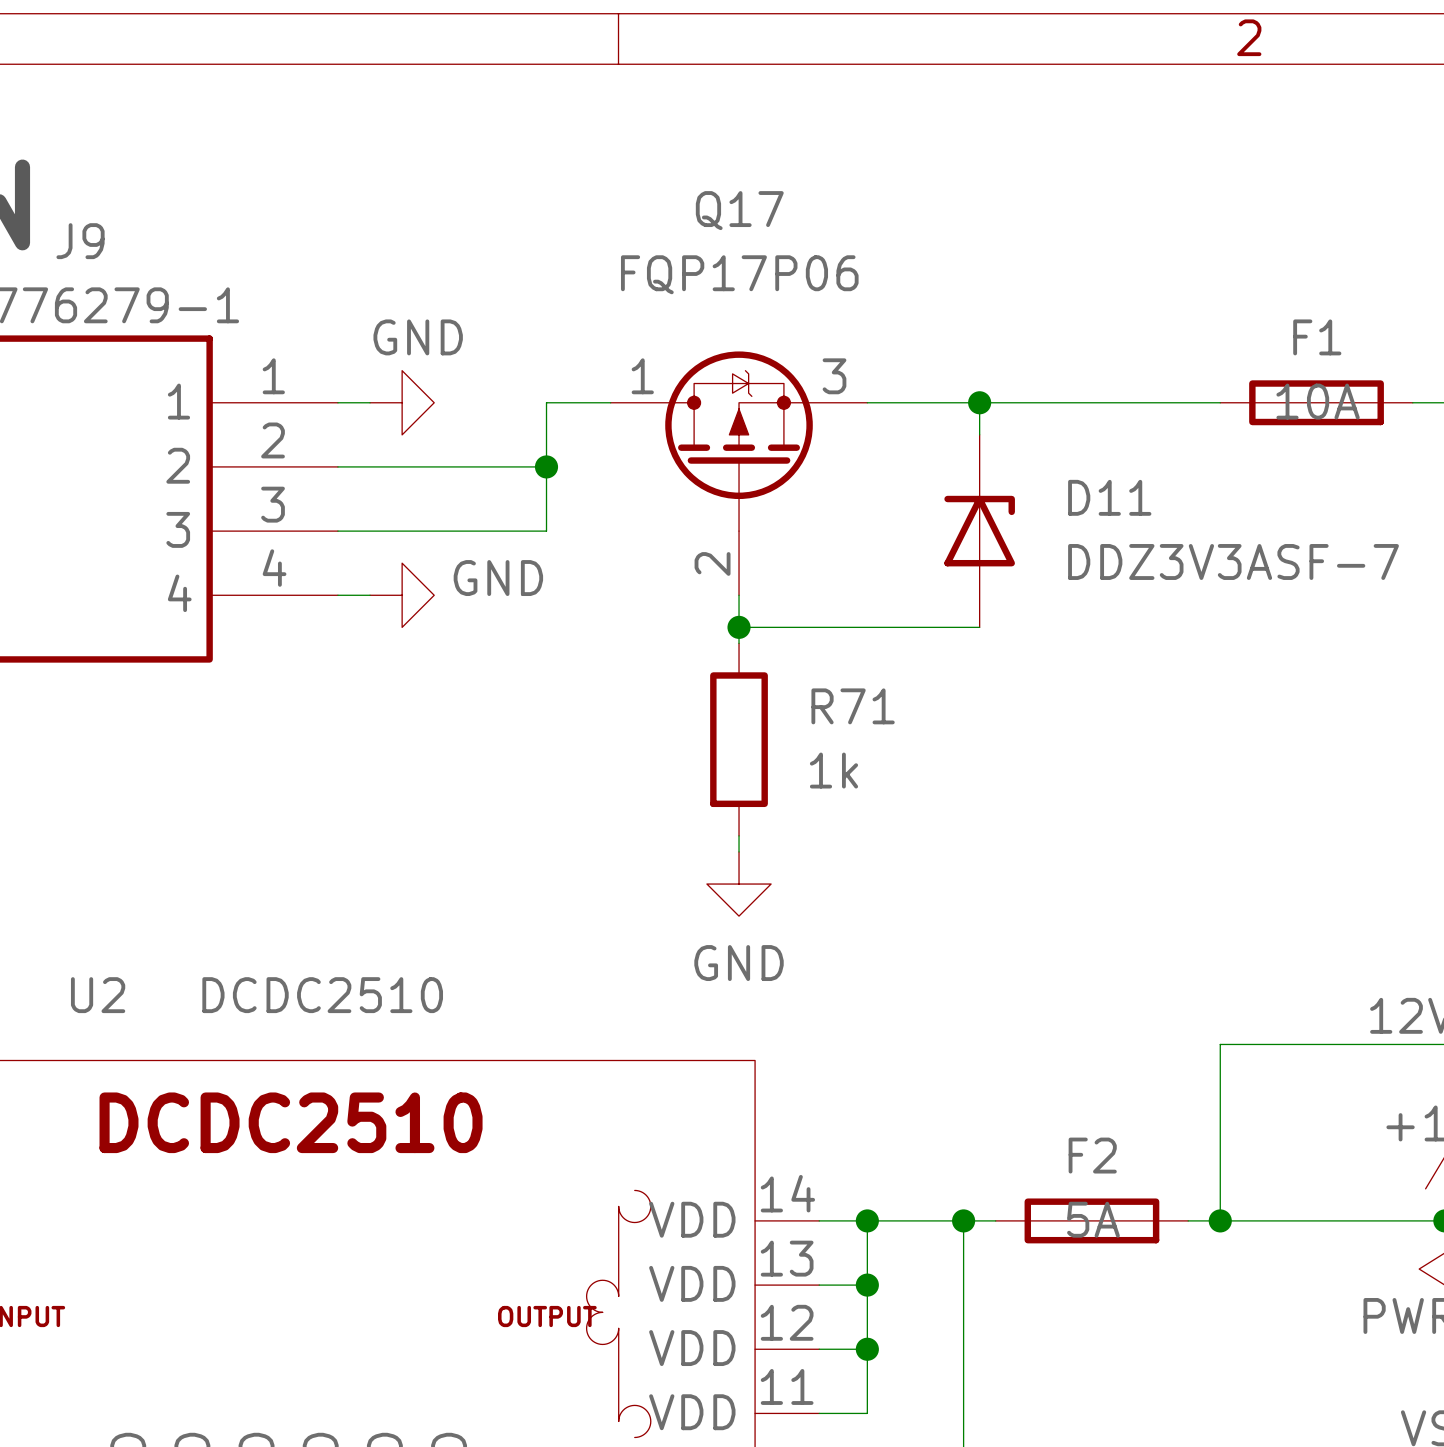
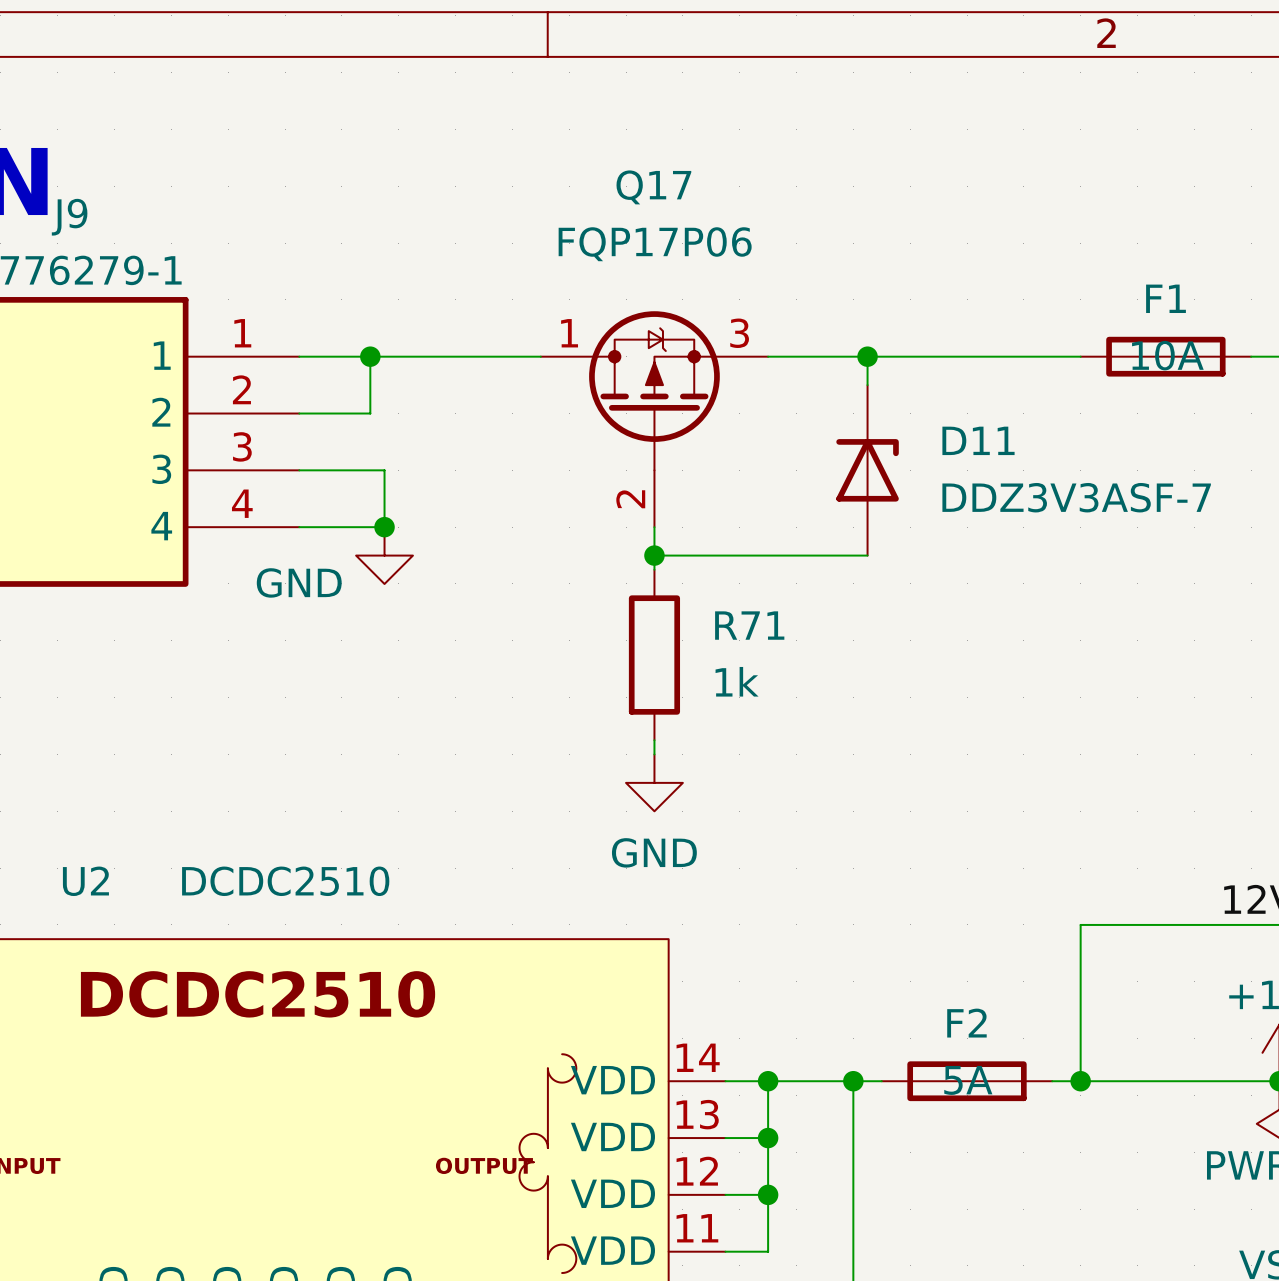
power symbol: GND (402, 402) -> none
junction: none -> (370, 356)
wire: (546, 402) (546, 531) (434, 531) -> (483, 356) (327, 356)
wire: (418, 466) (546, 466) -> (370, 413) (370, 356)
junction: (546, 466) -> none
wire: none -> (384, 470) (384, 527) (327, 527)
power symbol text position: GND (498, 578) -> GND (299, 582)
power symbol rotation: 0° (402, 595) -> 90° clockwise (384, 555)
power symbol position: GND (402, 595) -> GND (384, 555)
junction: none -> (384, 527)

